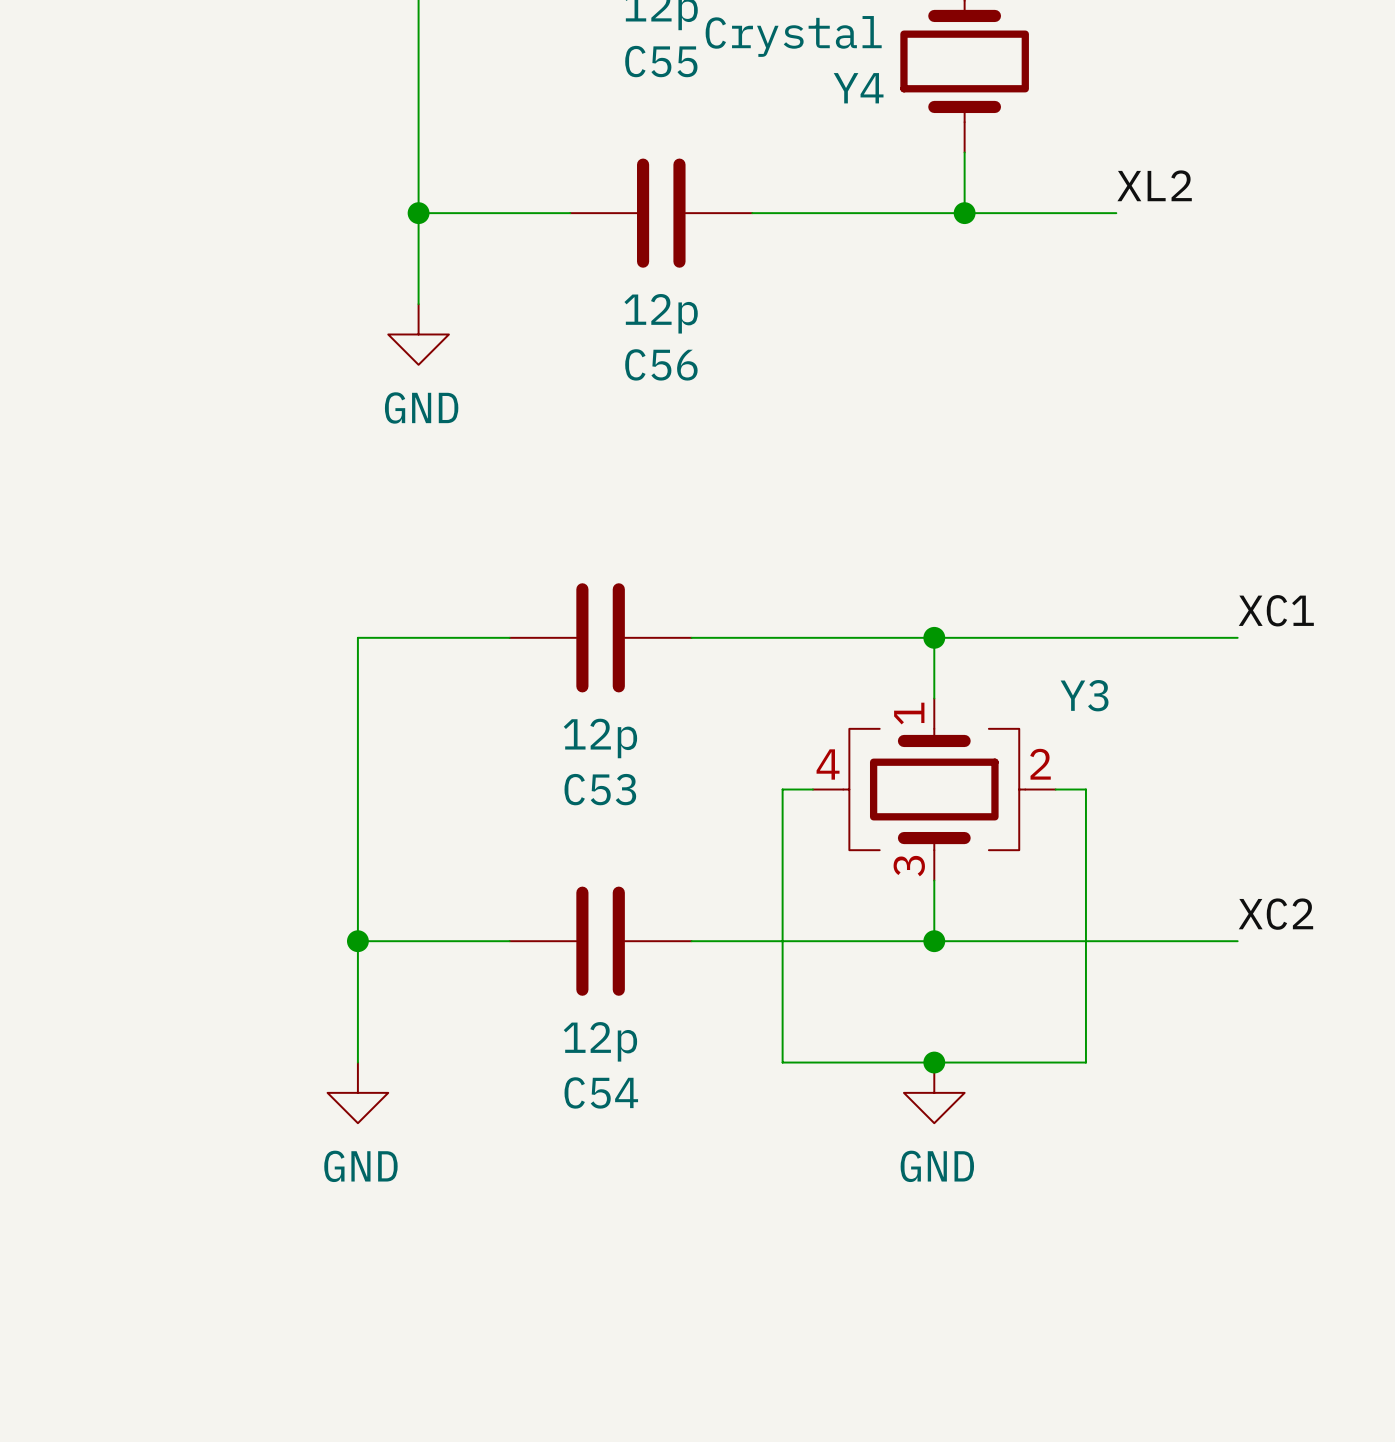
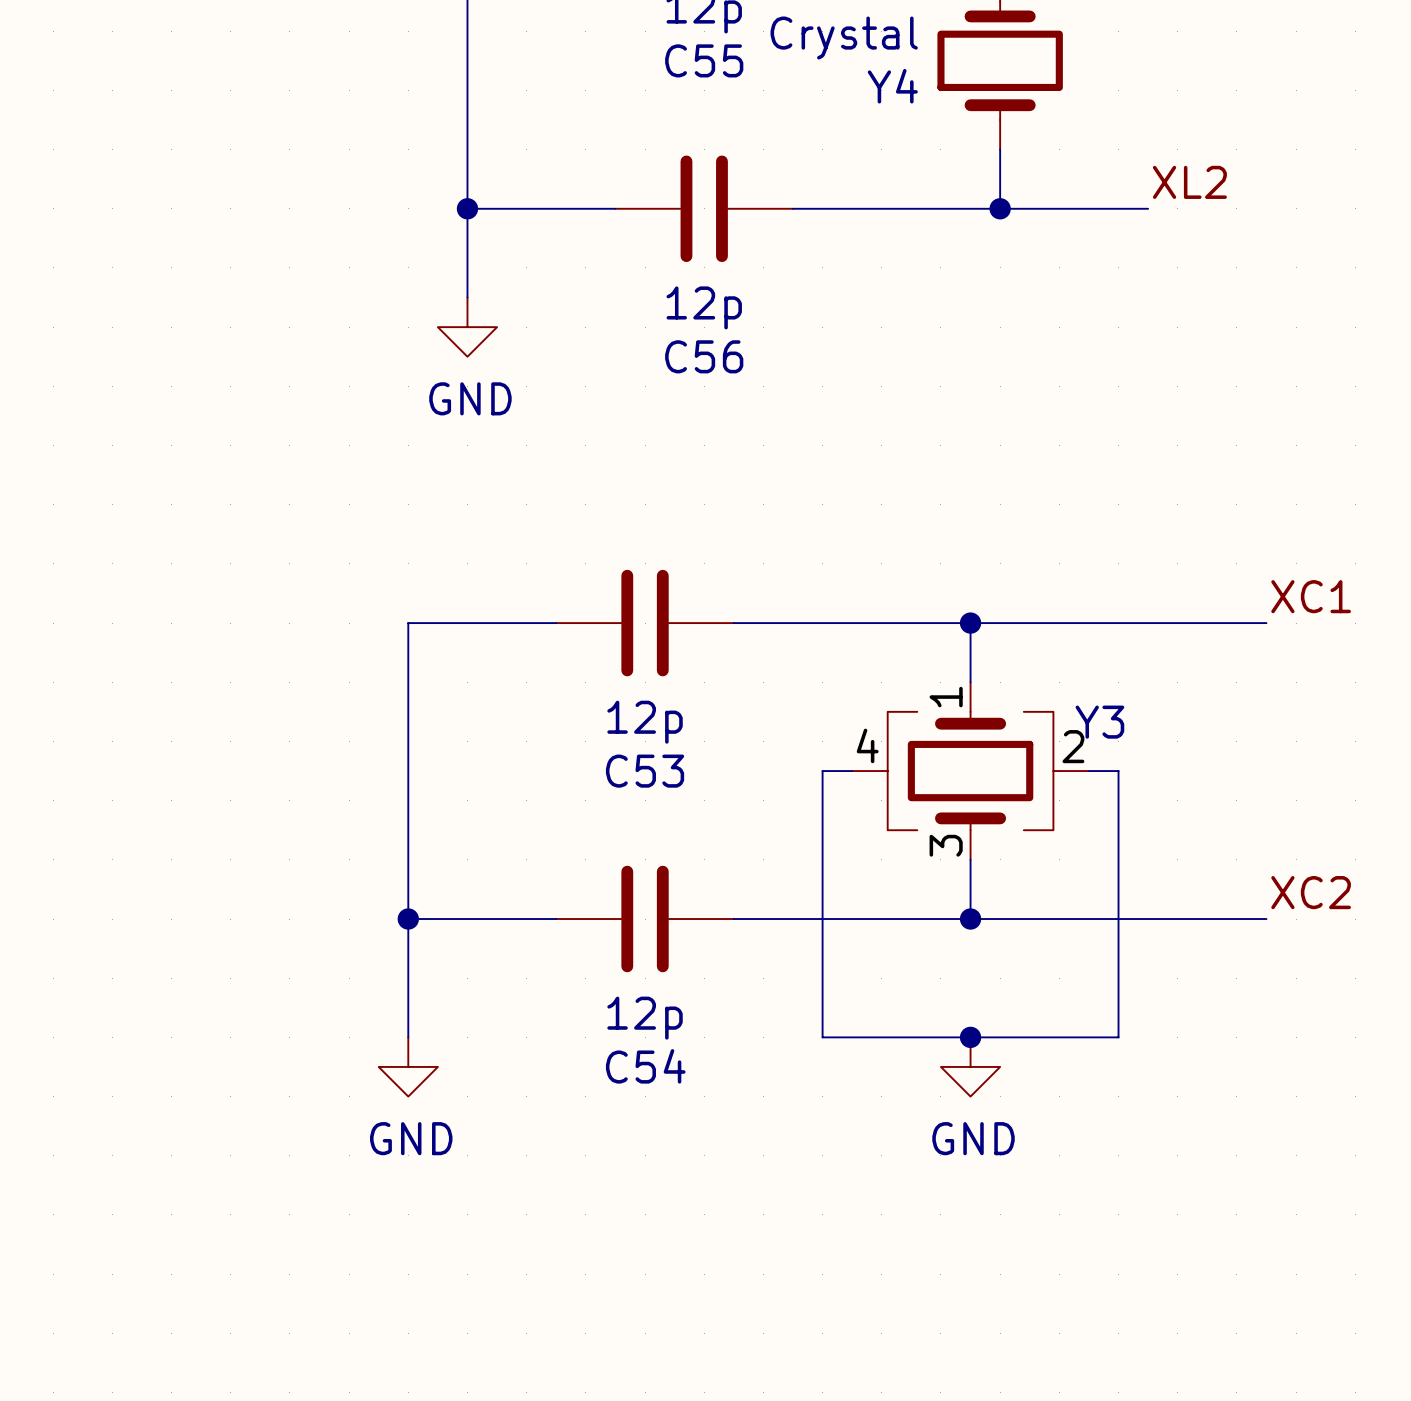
Y3 name position: Y3 (1084, 695) -> Y3 (1099, 722)

